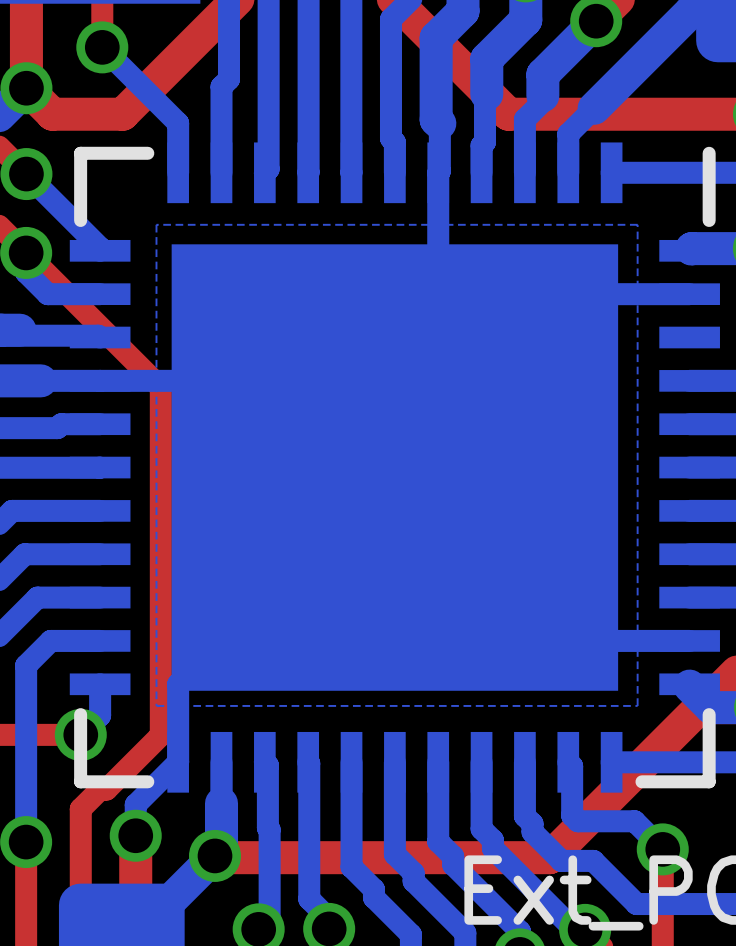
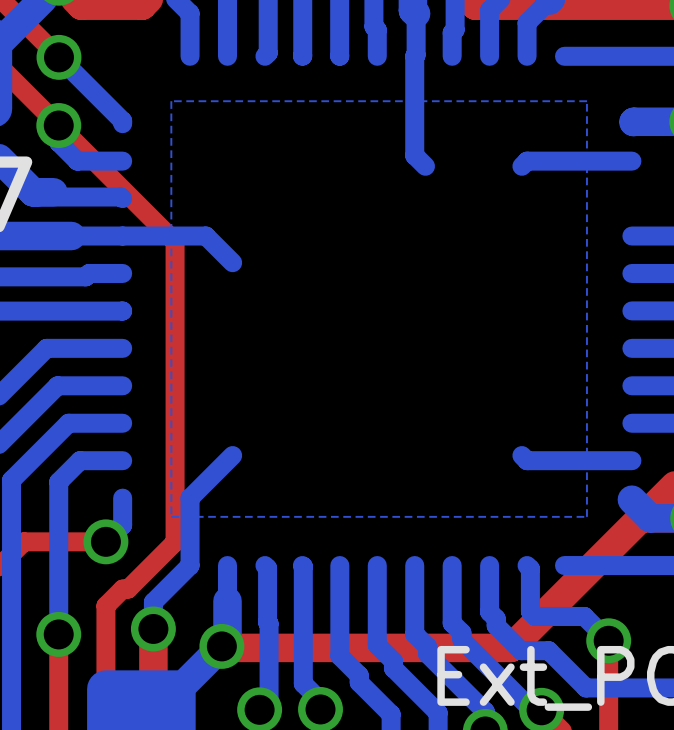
part: (394, 467) -> none

